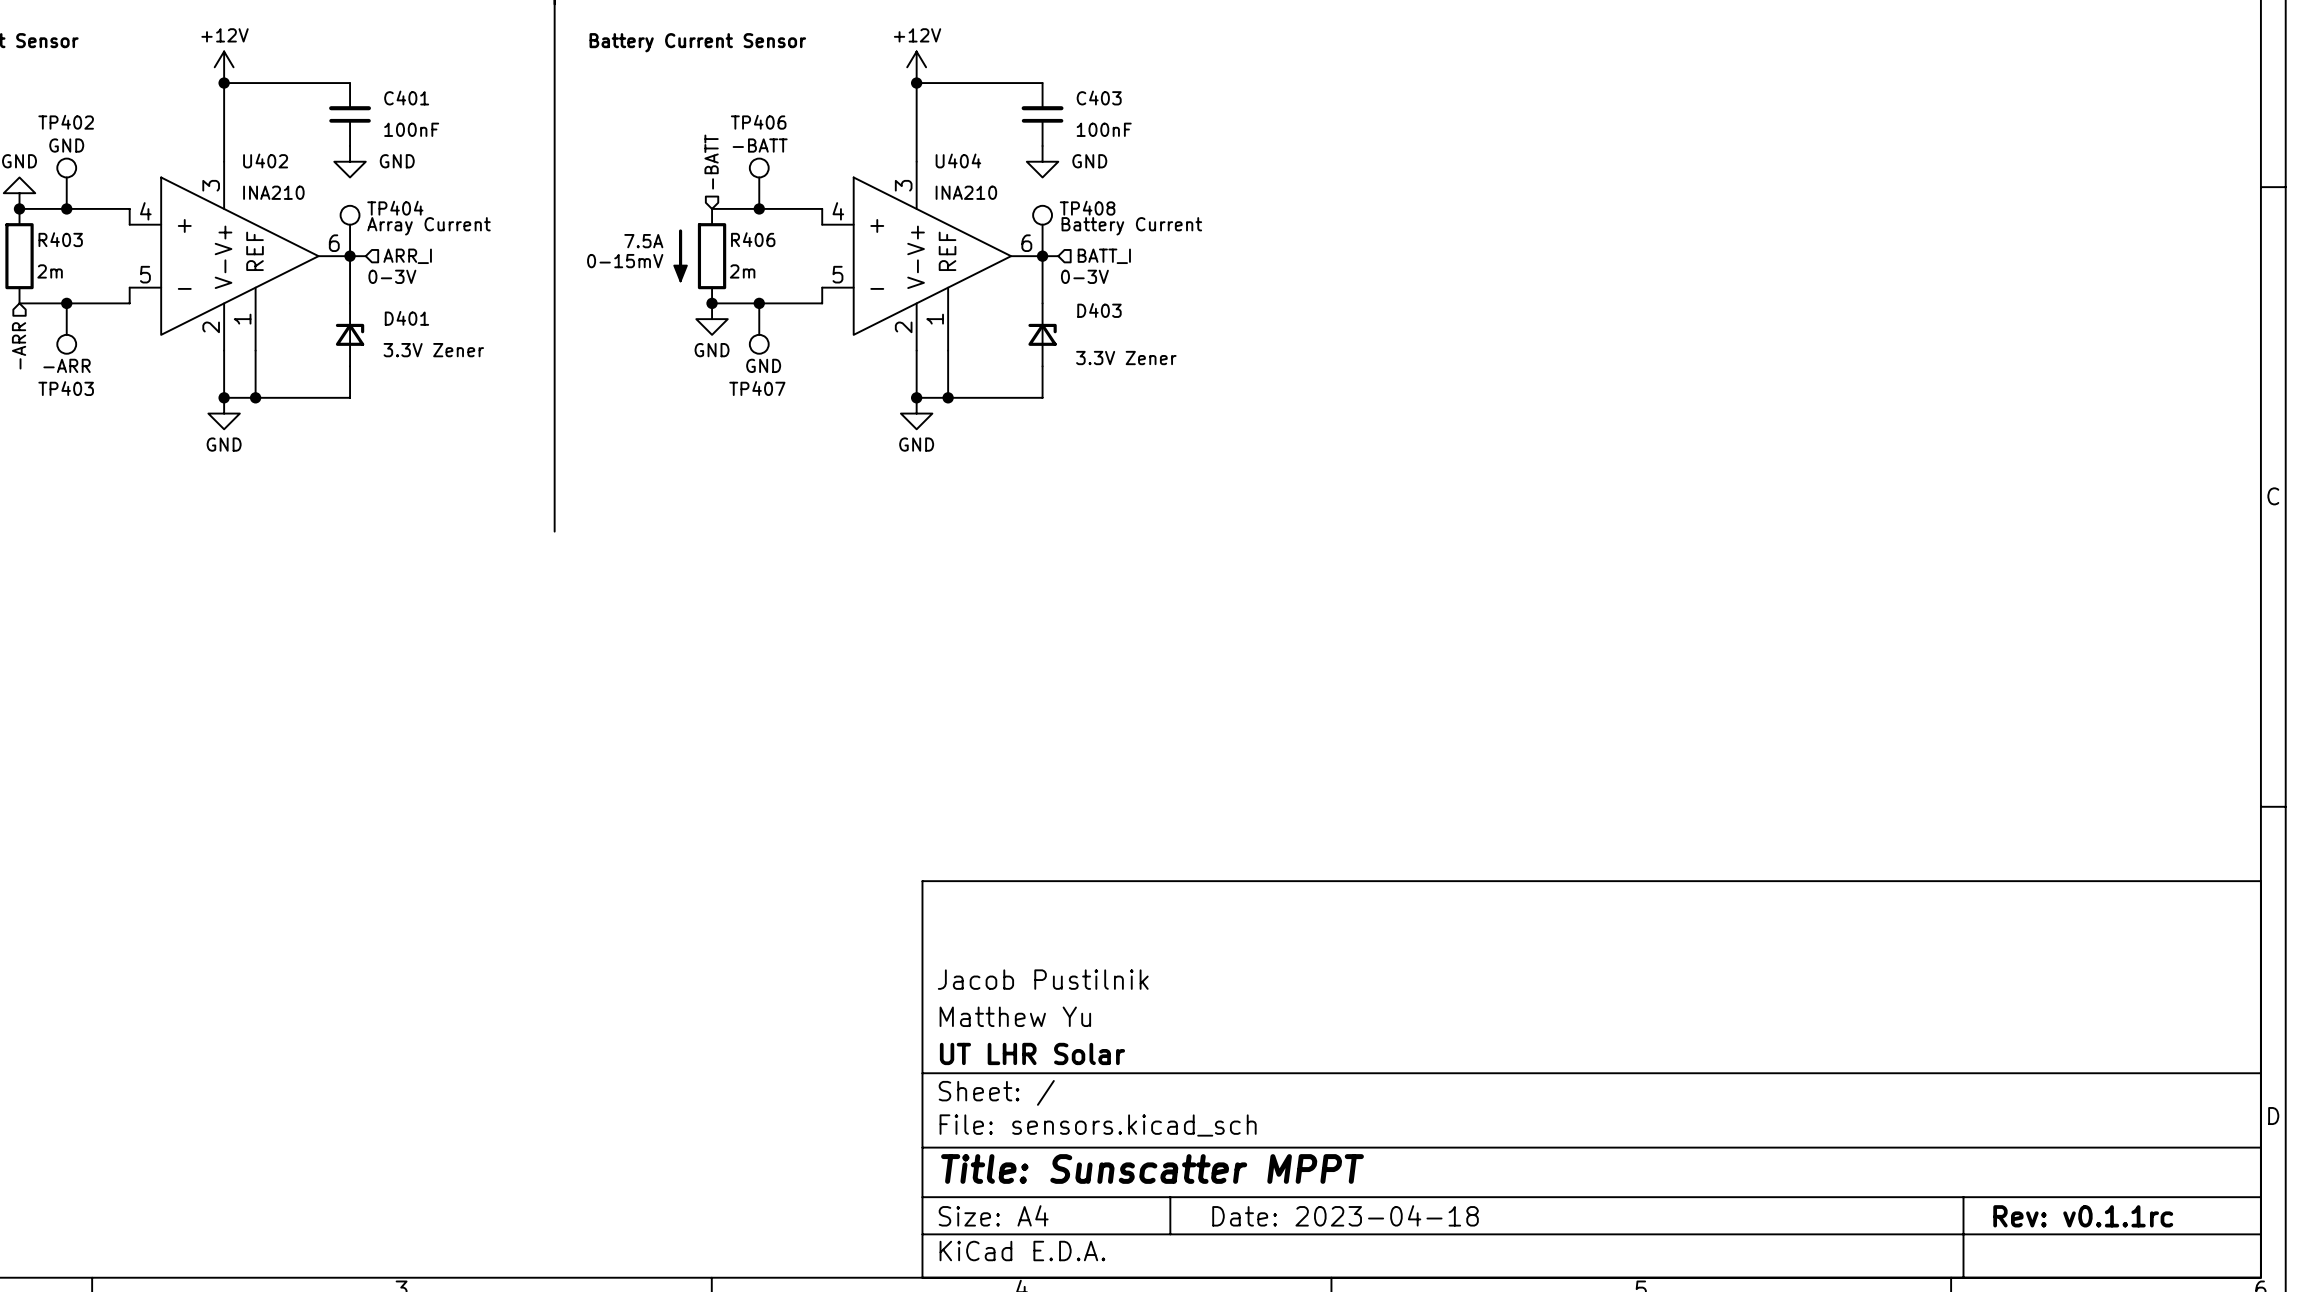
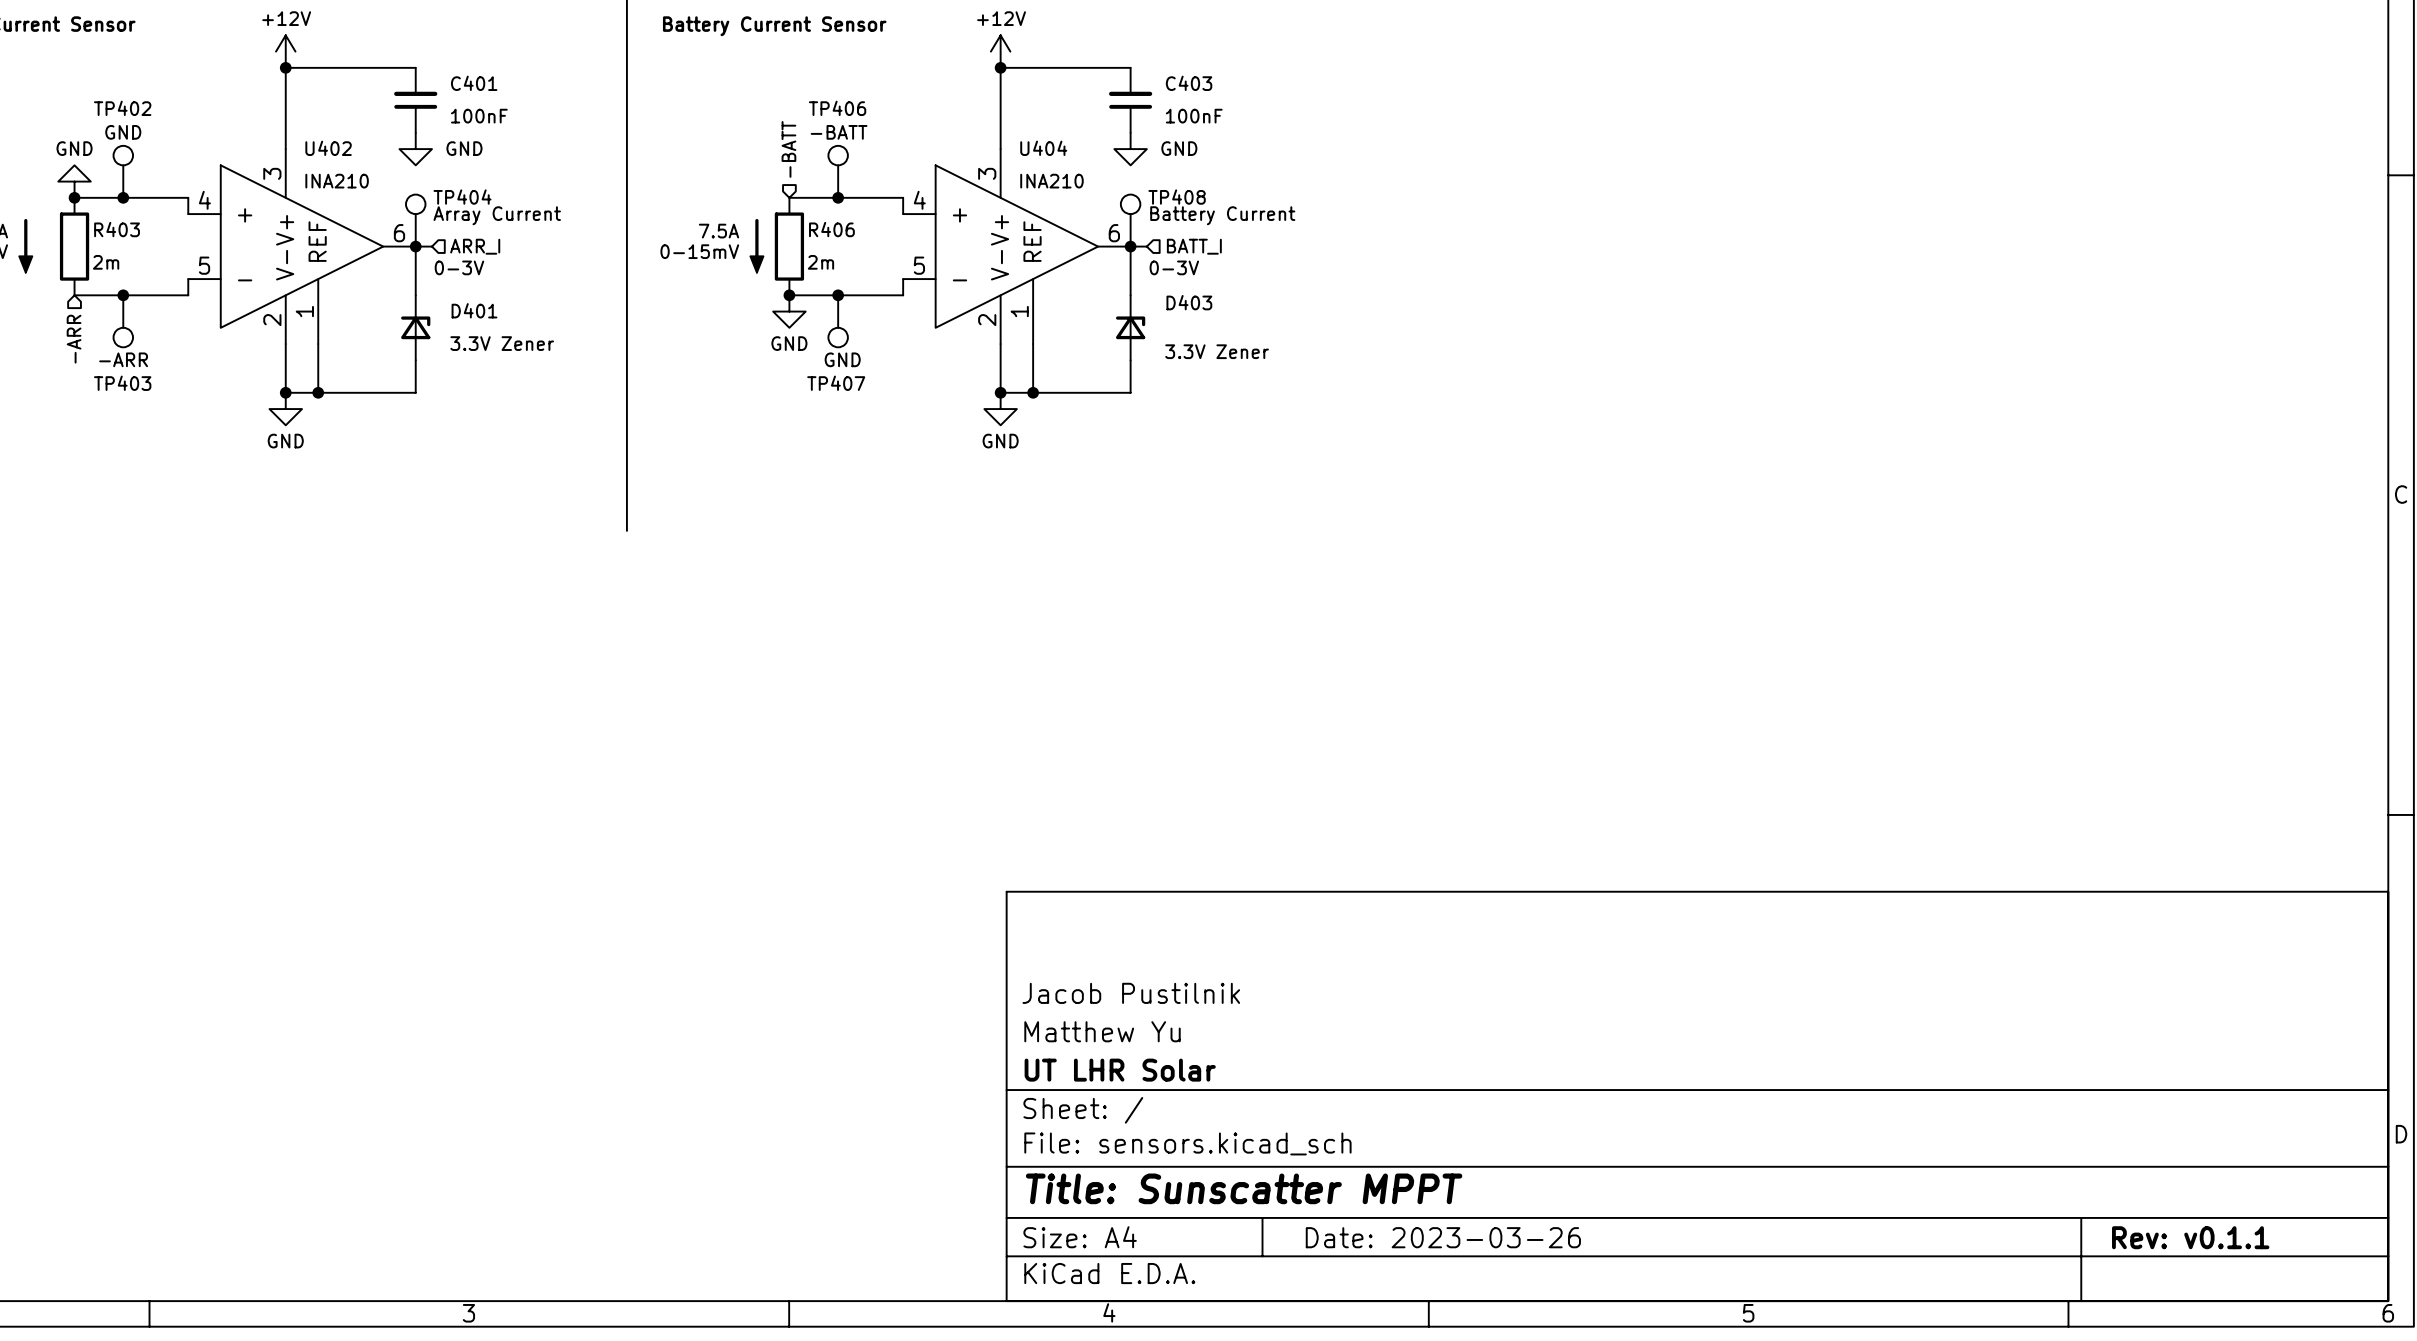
title block: Date: 2023-04-18 (1345, 1215) -> Date: 2023-03-26 (1443, 1237)
title block: Rev: v0.1.1rc (2083, 1216) -> Rev: v0.1.1 (2190, 1237)

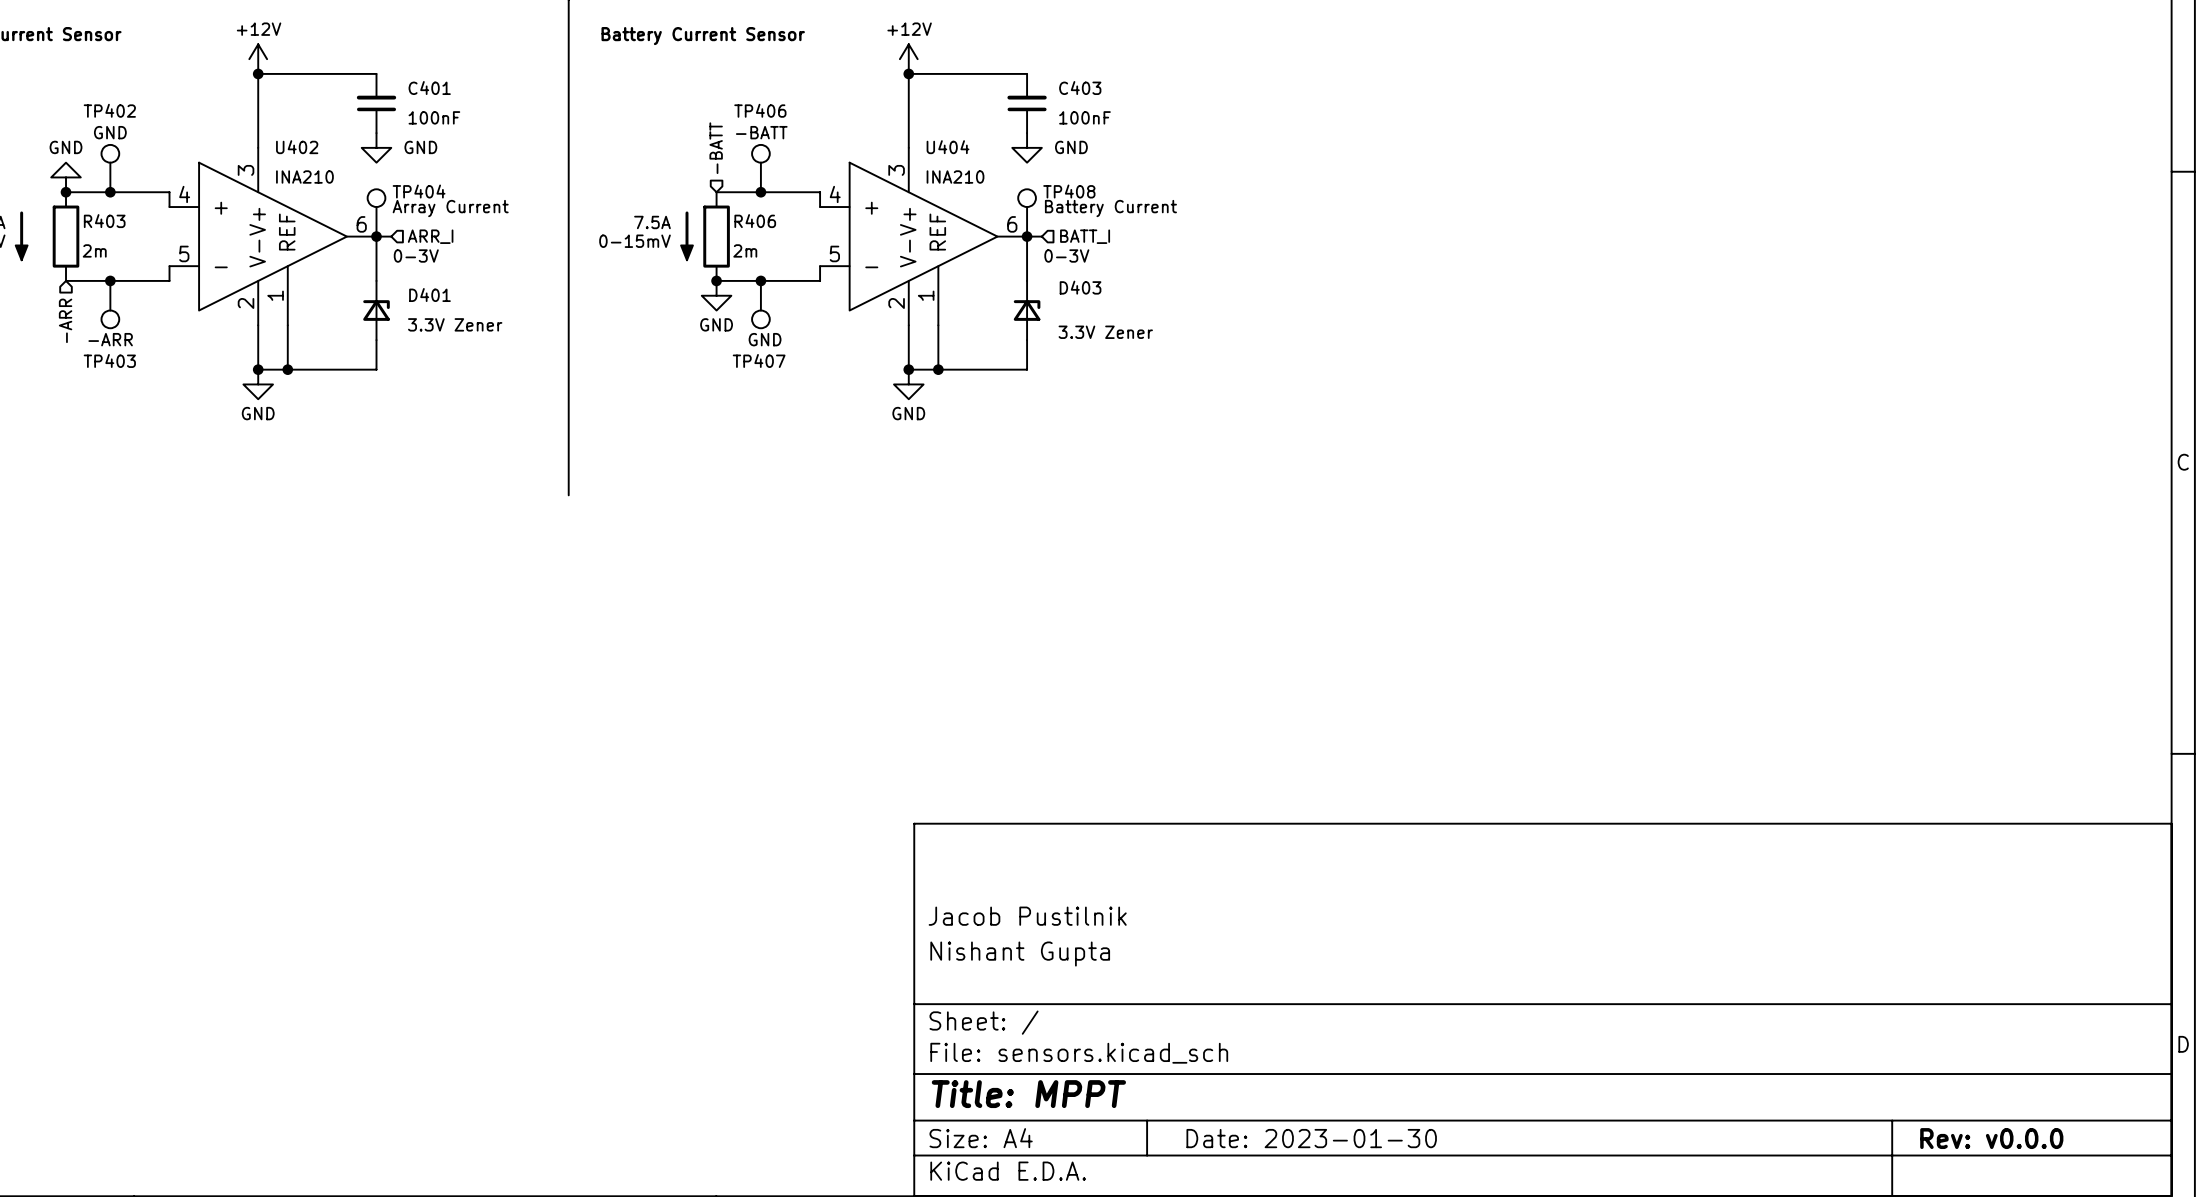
title block: Matthew Yu (1102, 1031) -> Nishant Gupta (1020, 954)
title block: UT LHR Solar (1120, 1070) -> none
title block: Title: Sunscatter MPPT (1244, 1188) -> Title: MPPT (1028, 1094)
title block: Date: 2023-03-26 (1443, 1237) -> Date: 2023-01-30 (1311, 1138)
title block: Rev: v0.1.1 (2190, 1237) -> Rev: v0.0.0 (1991, 1138)

